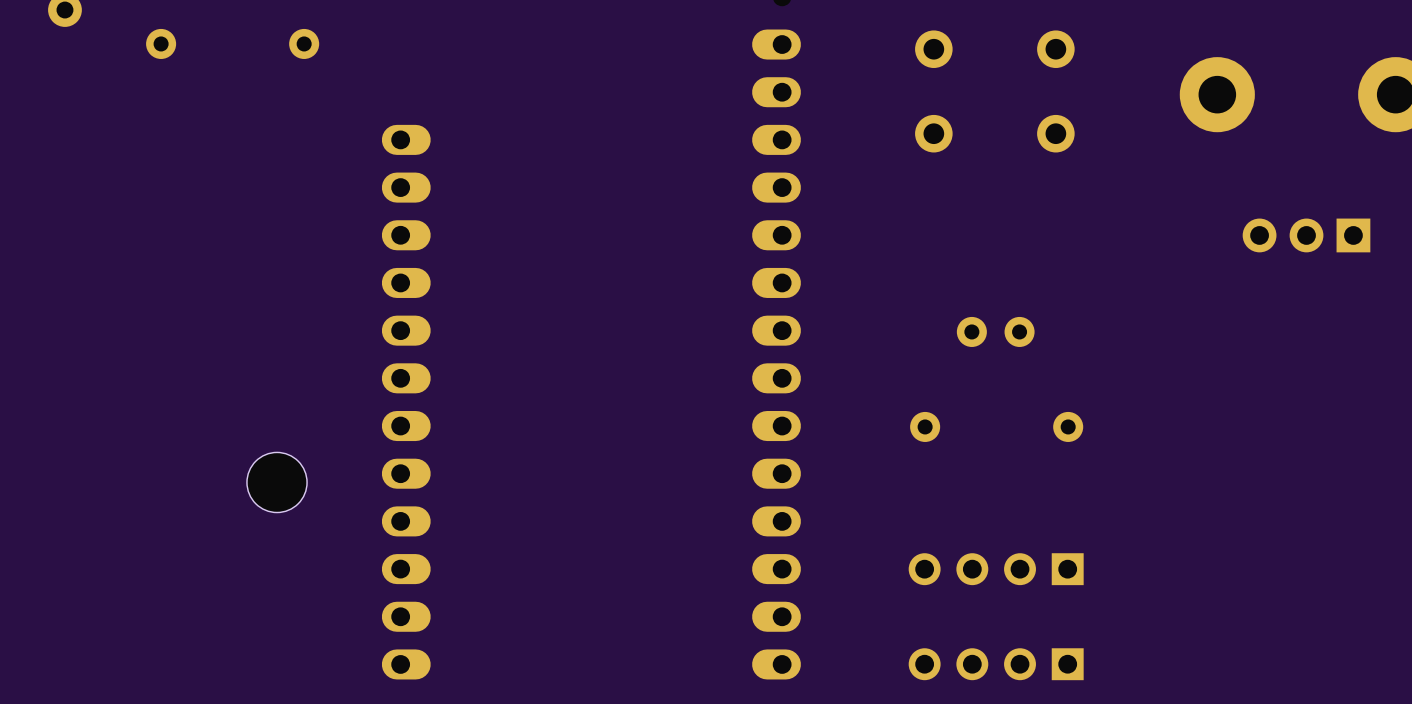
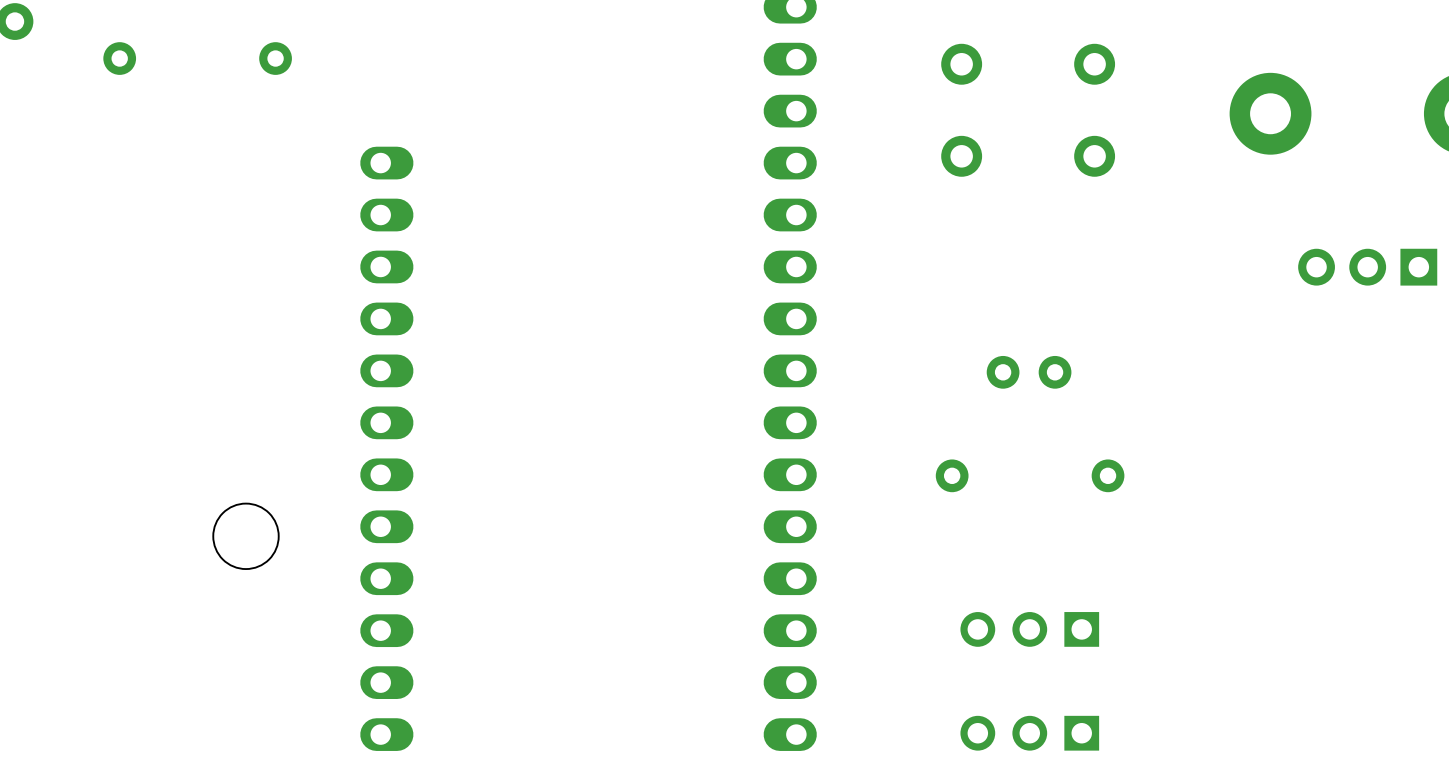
part footprint: [908, 553, 1084, 586] -> [960, 612, 1100, 647]
part footprint: [908, 648, 1084, 681] -> [960, 715, 1100, 751]

